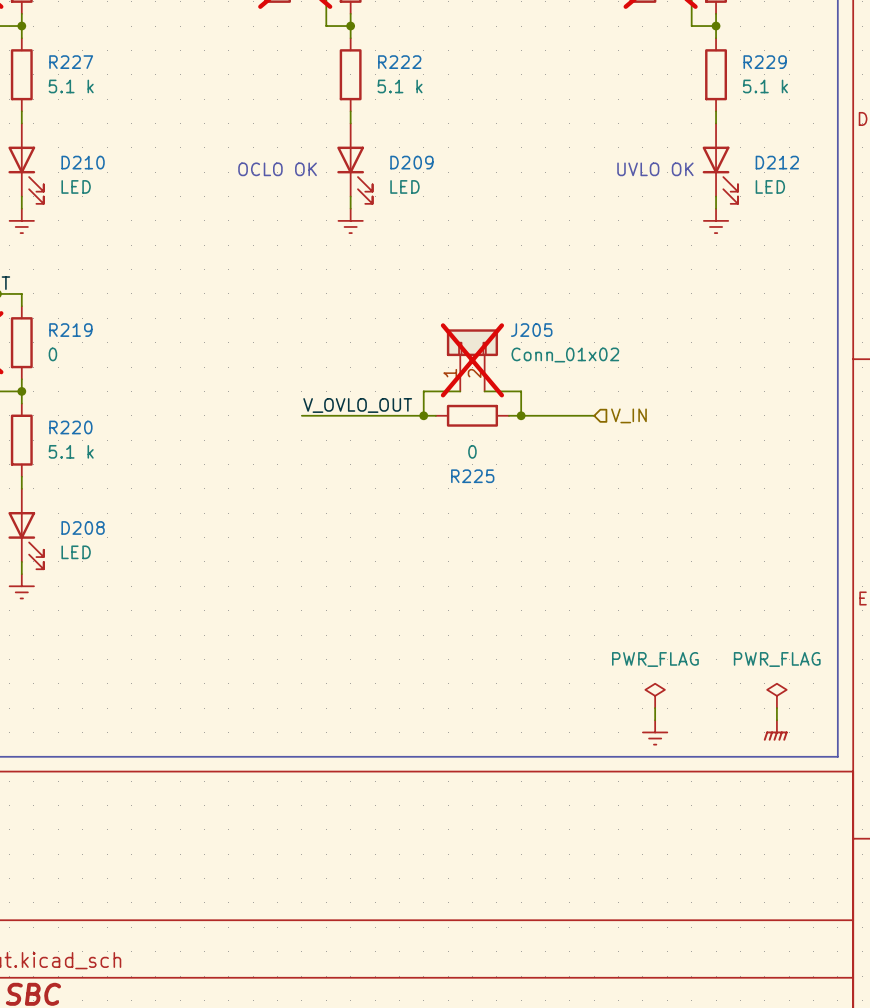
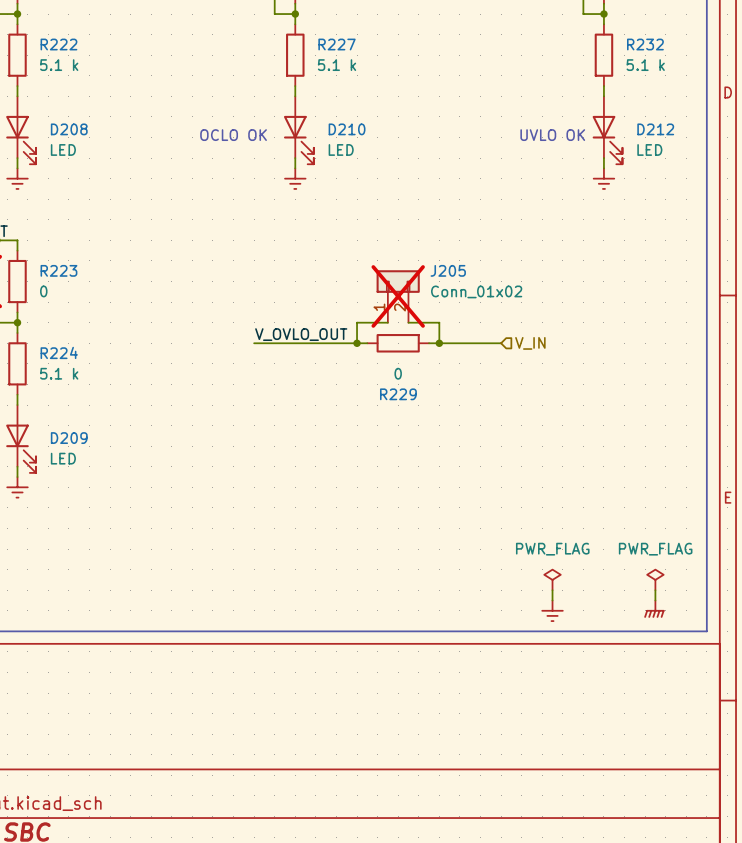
R227 name: R227 (71, 62) -> R222 (58, 44)
R222 name: R222 (399, 62) -> R227 (337, 44)
R229 name: R229 (765, 62) -> R232 (645, 44)
D210 name: D210 (83, 162) -> D208 (69, 129)
D209 name: D209 (411, 162) -> D210 (347, 129)
R219 name: R219 (70, 330) -> R223 (58, 270)
R220 name: R220 (70, 427) -> R224 (59, 352)
R225 name: R225 (472, 476) -> R229 (398, 394)
D208 name: D208 (83, 527) -> D209 (69, 438)

